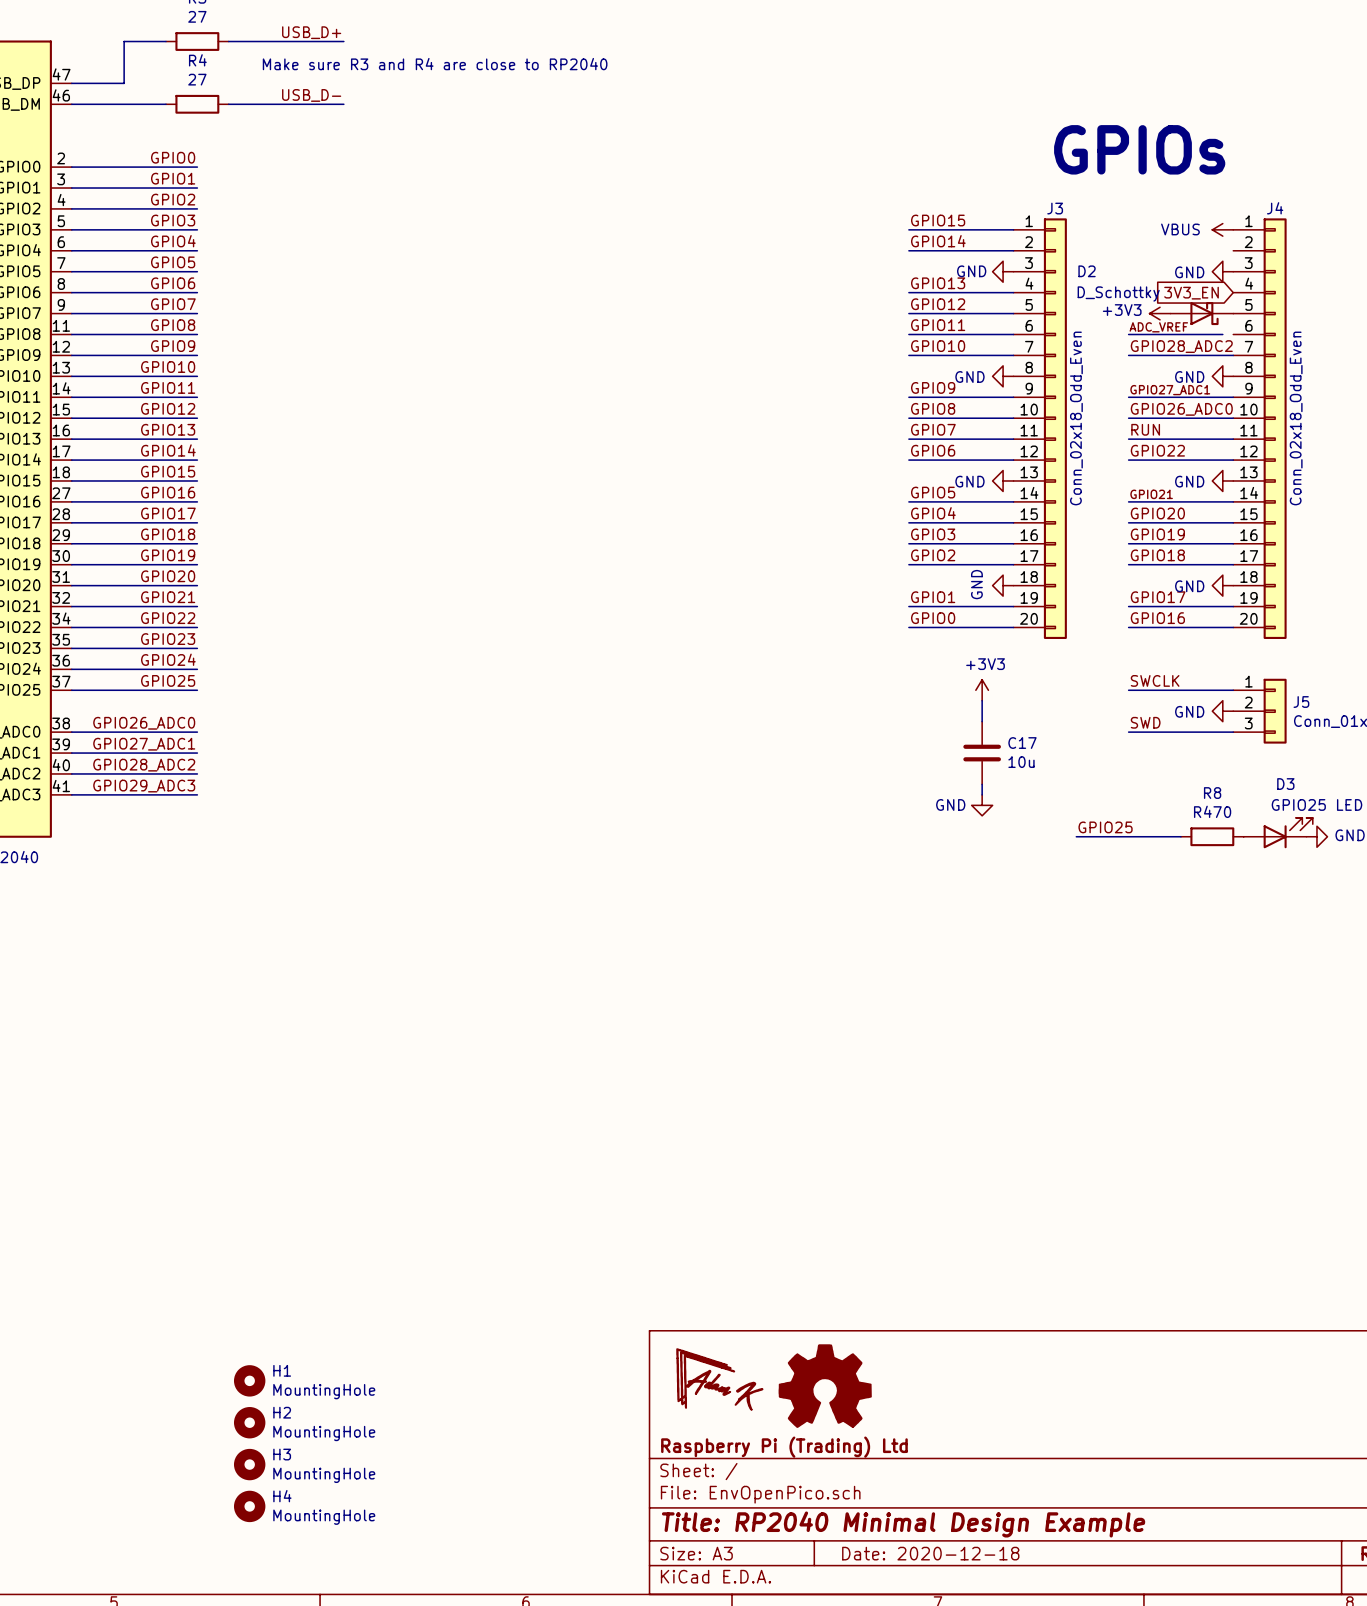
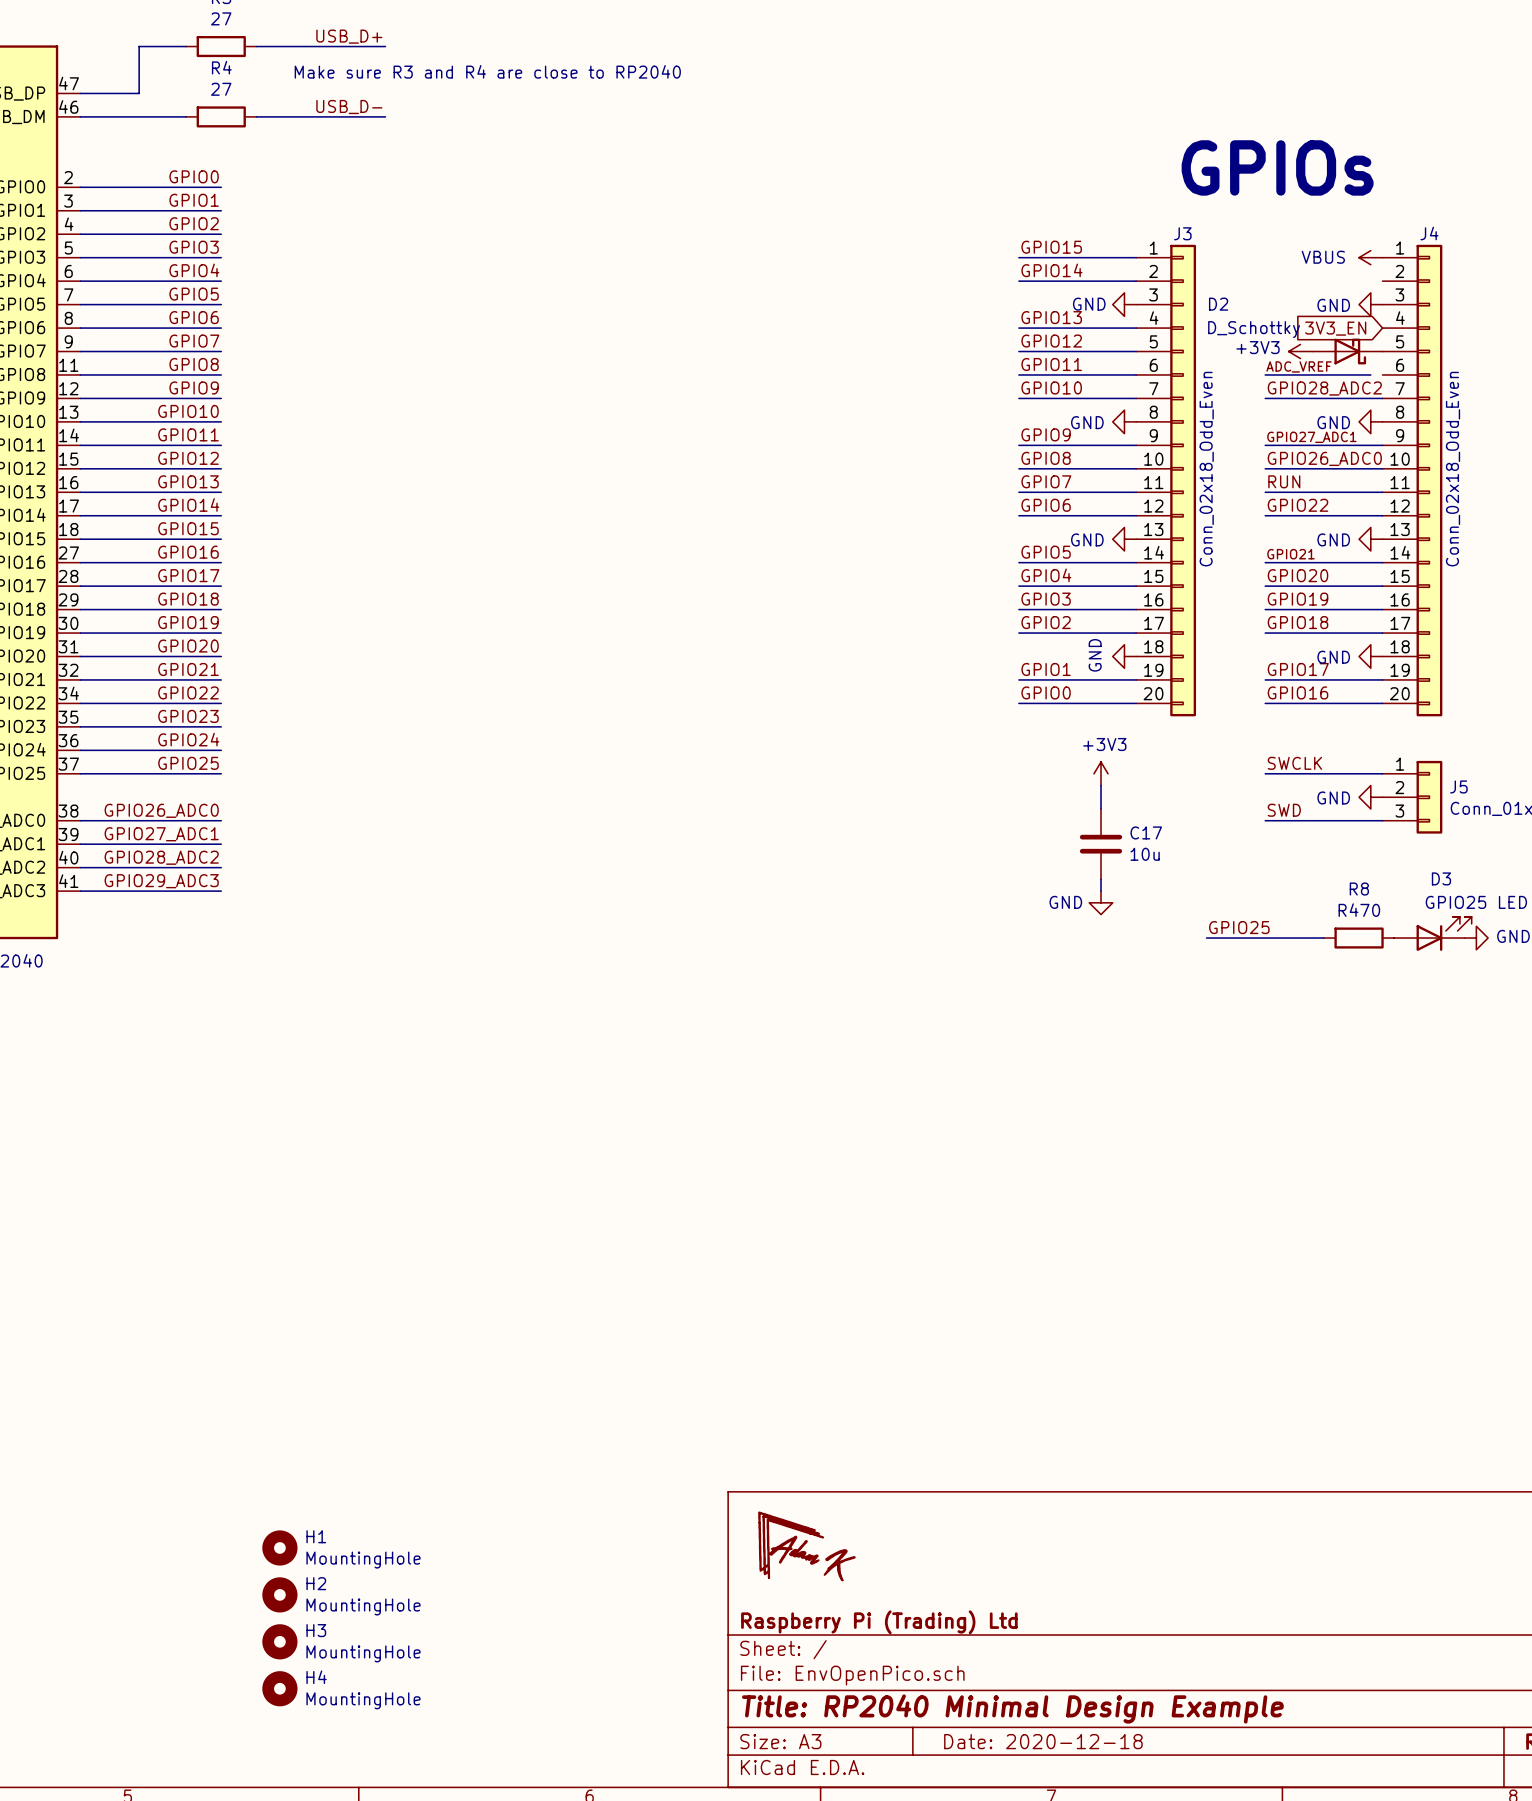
power symbol: (825, 1386) -> none

